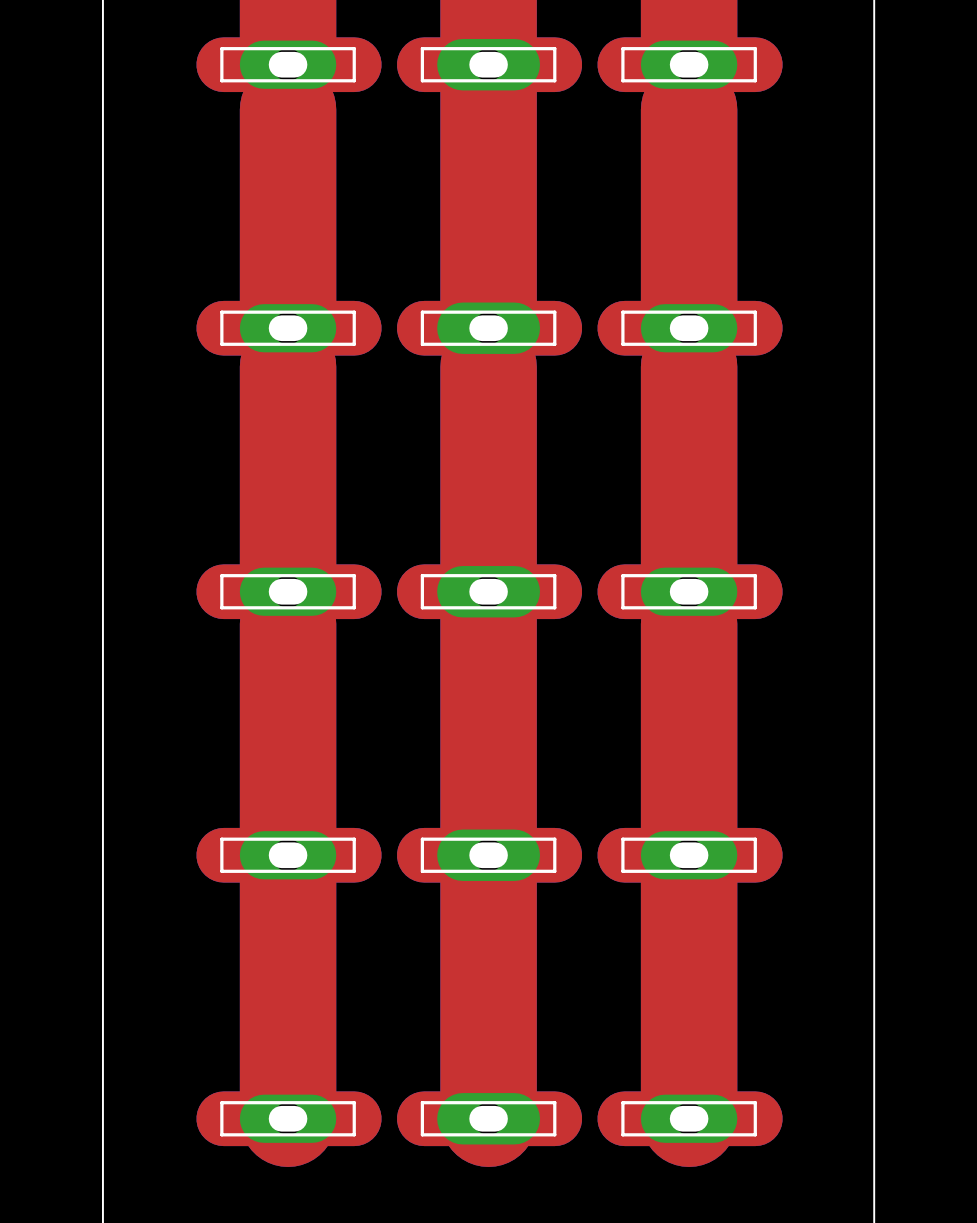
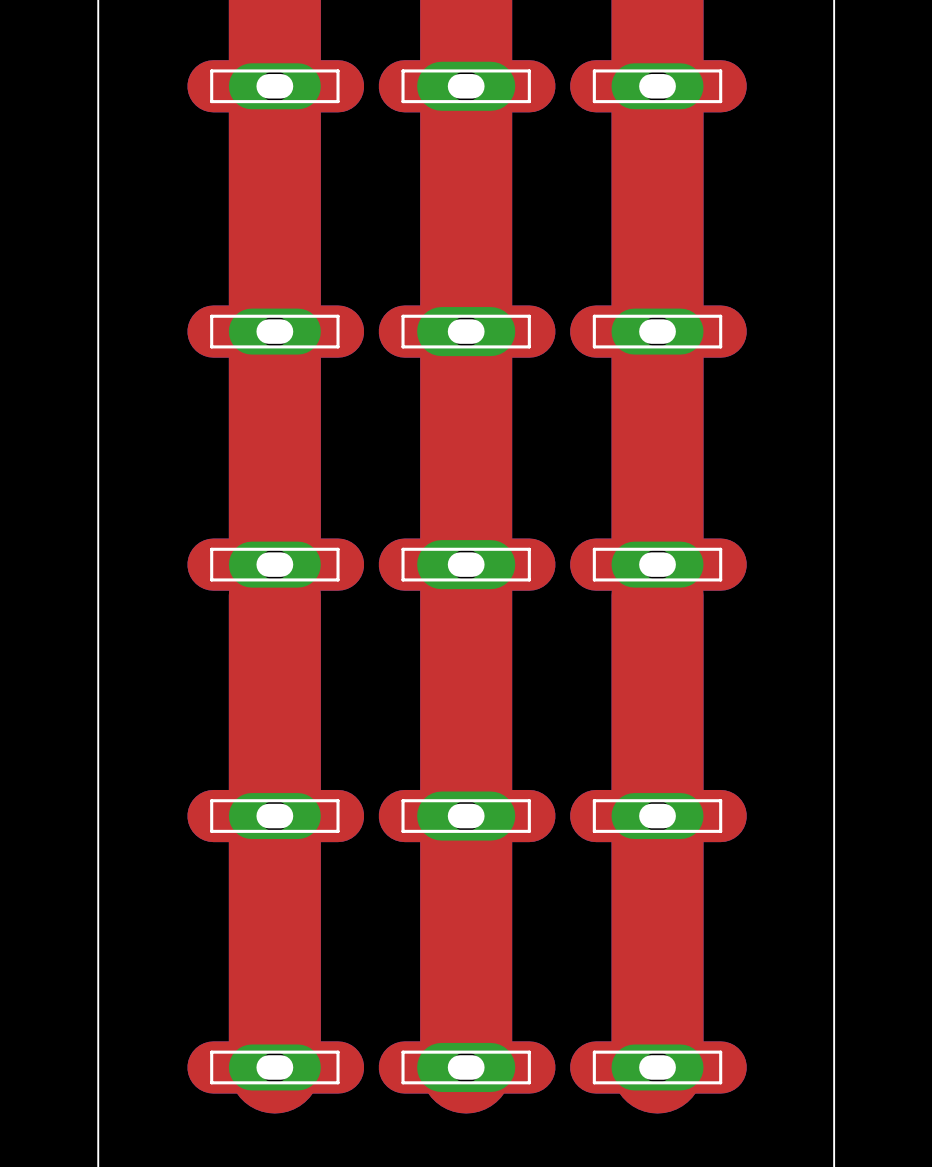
part position: (489, 64) -> (467, 86)
part position: (489, 328) -> (467, 331)

